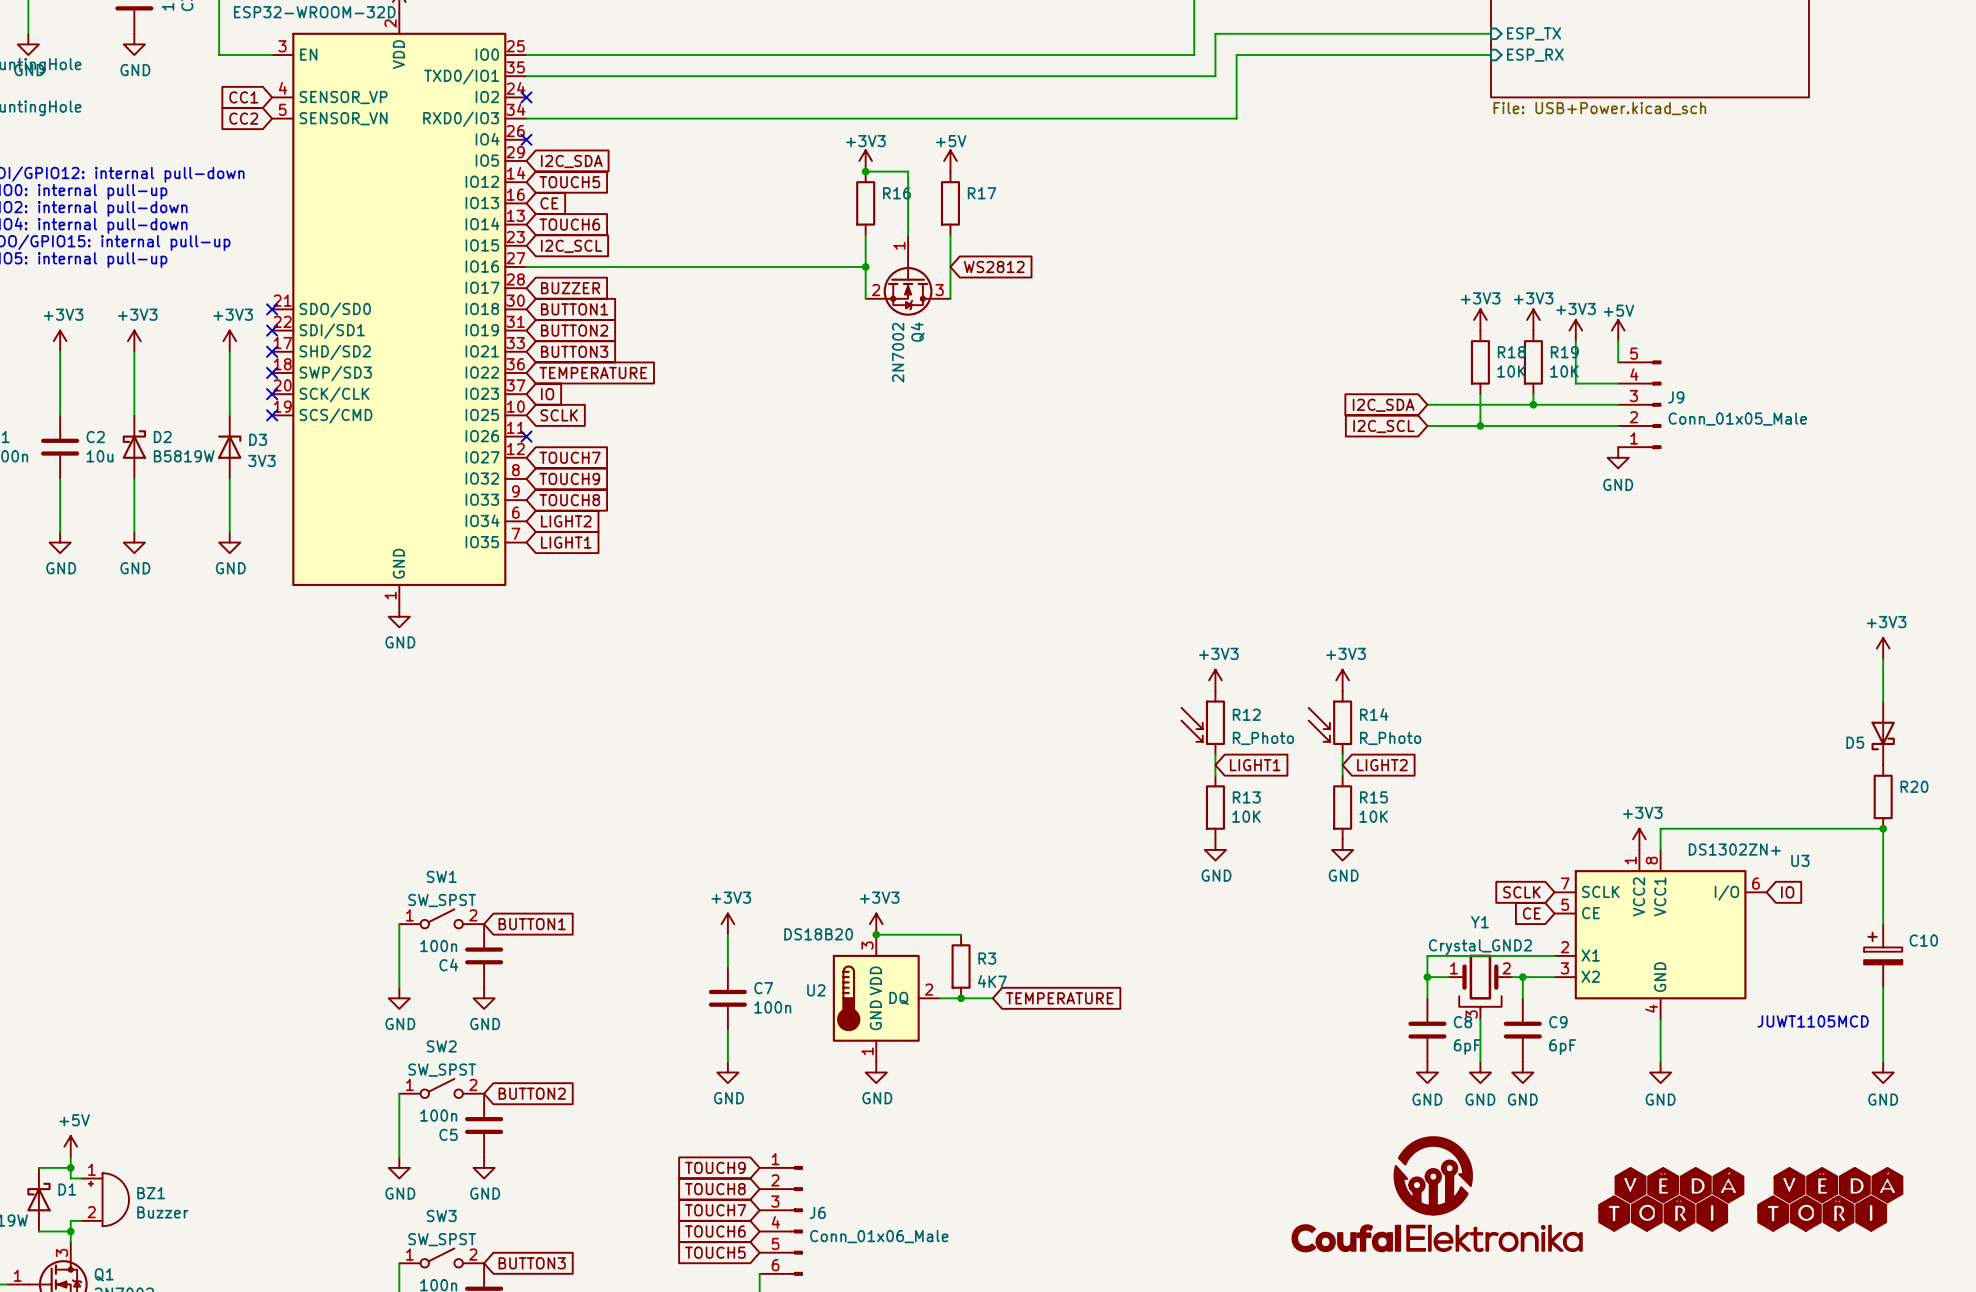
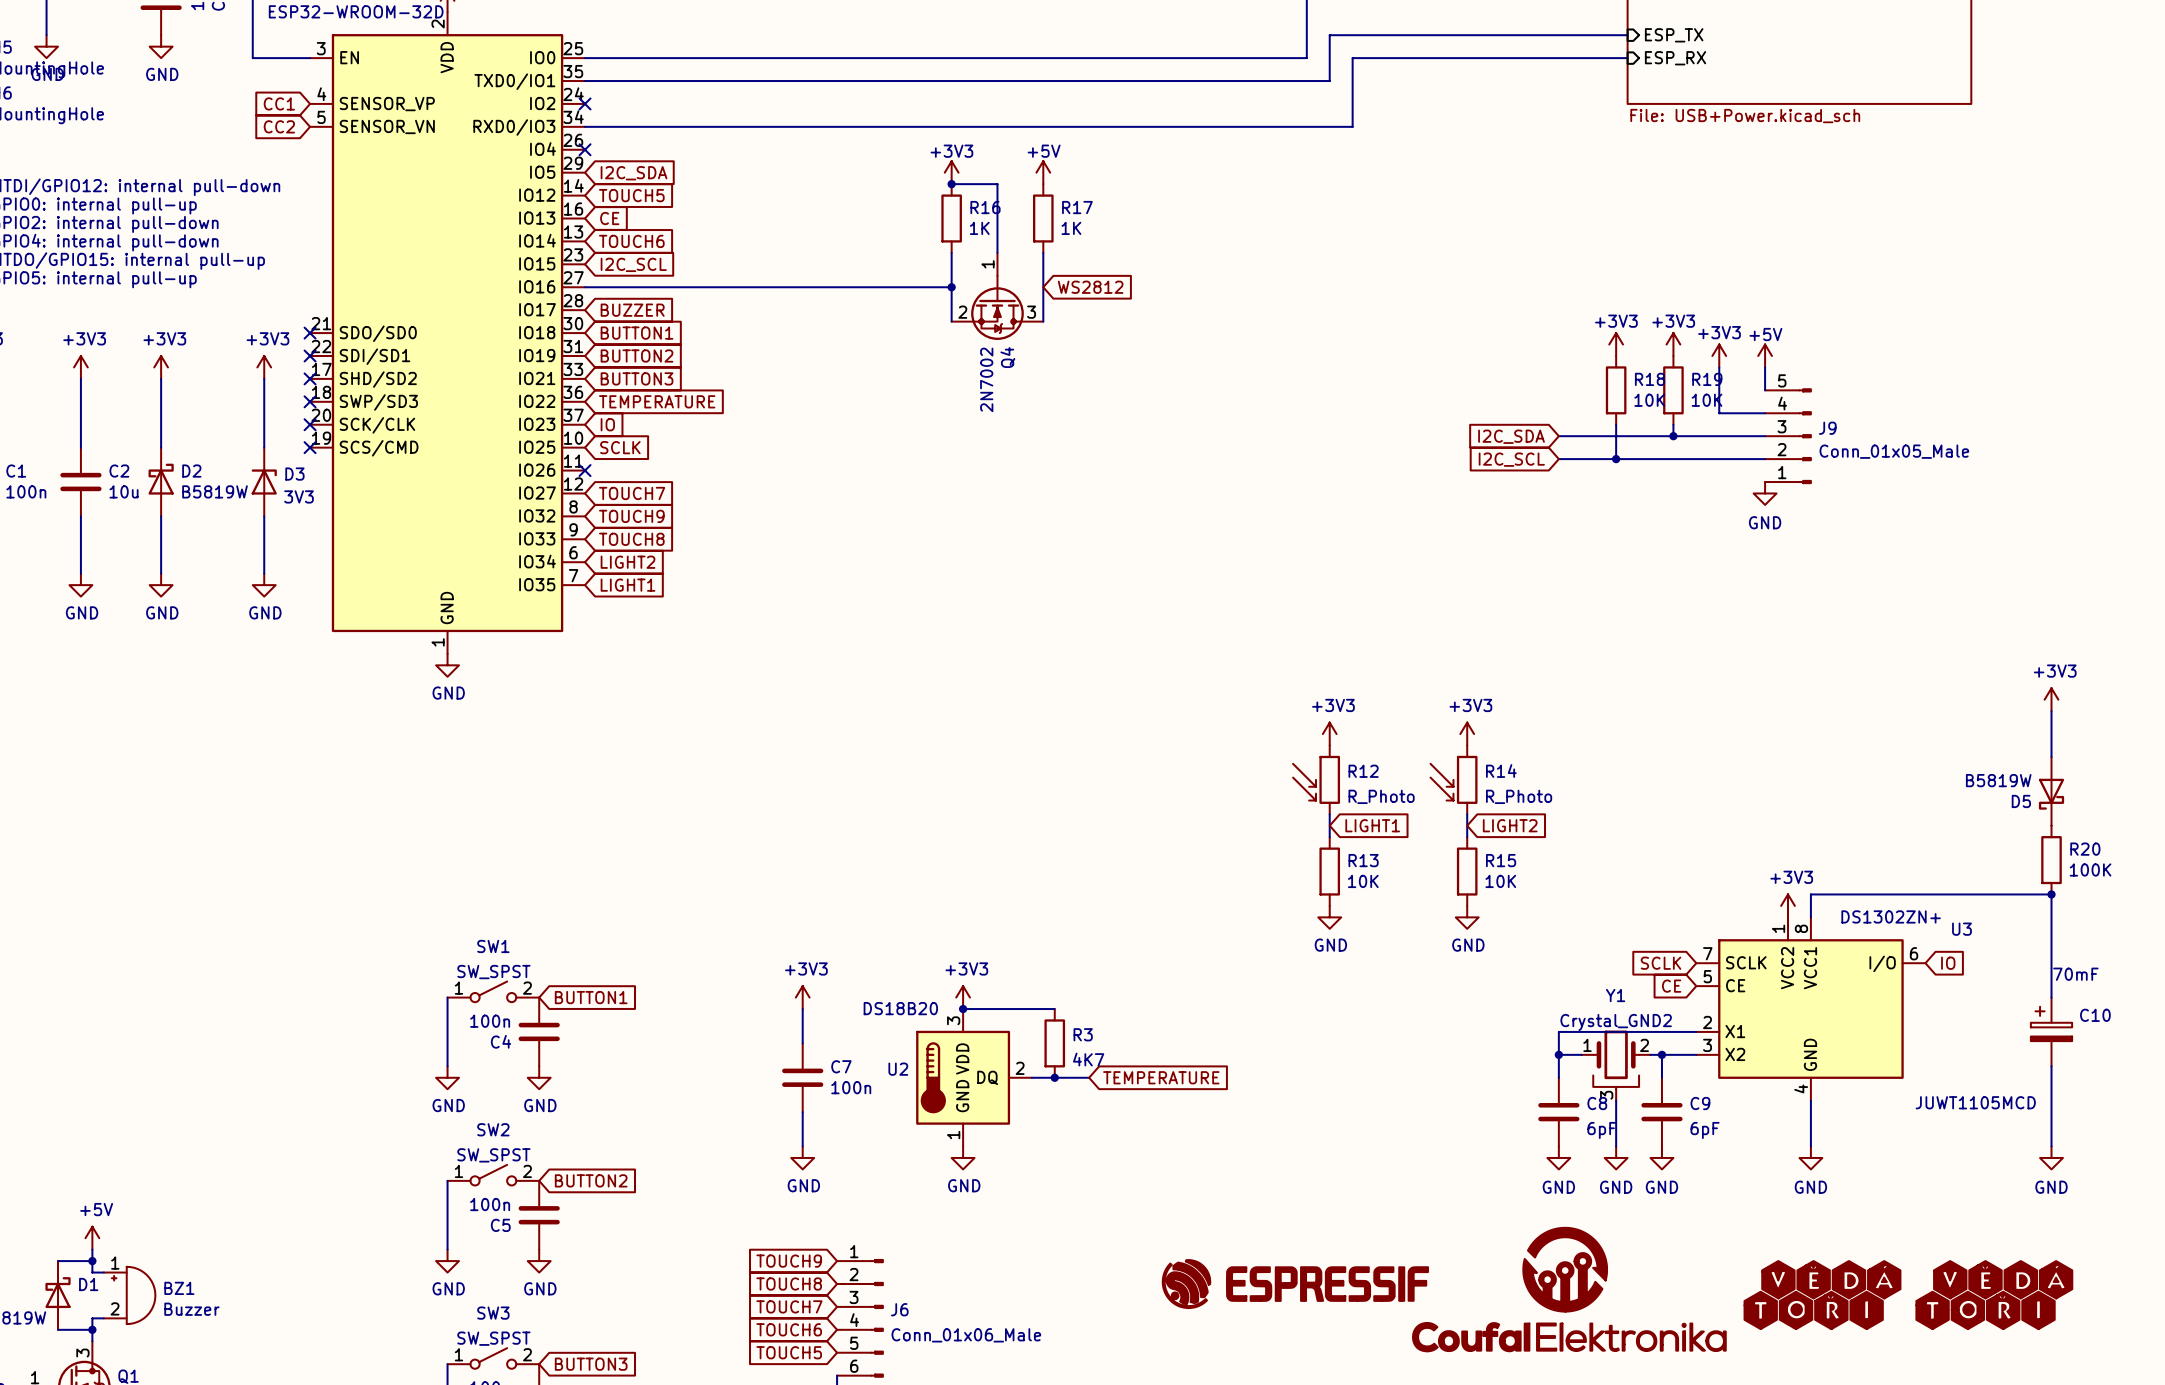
R16 value: none -> 1K (979, 228)
R17 value: none -> 1K (1071, 228)
D5 value: none -> B5819W (1998, 780)
R20 value: none -> 100K (2090, 869)
C10 value: none -> 70mF (2075, 974)
part: none -> (1295, 1284)

